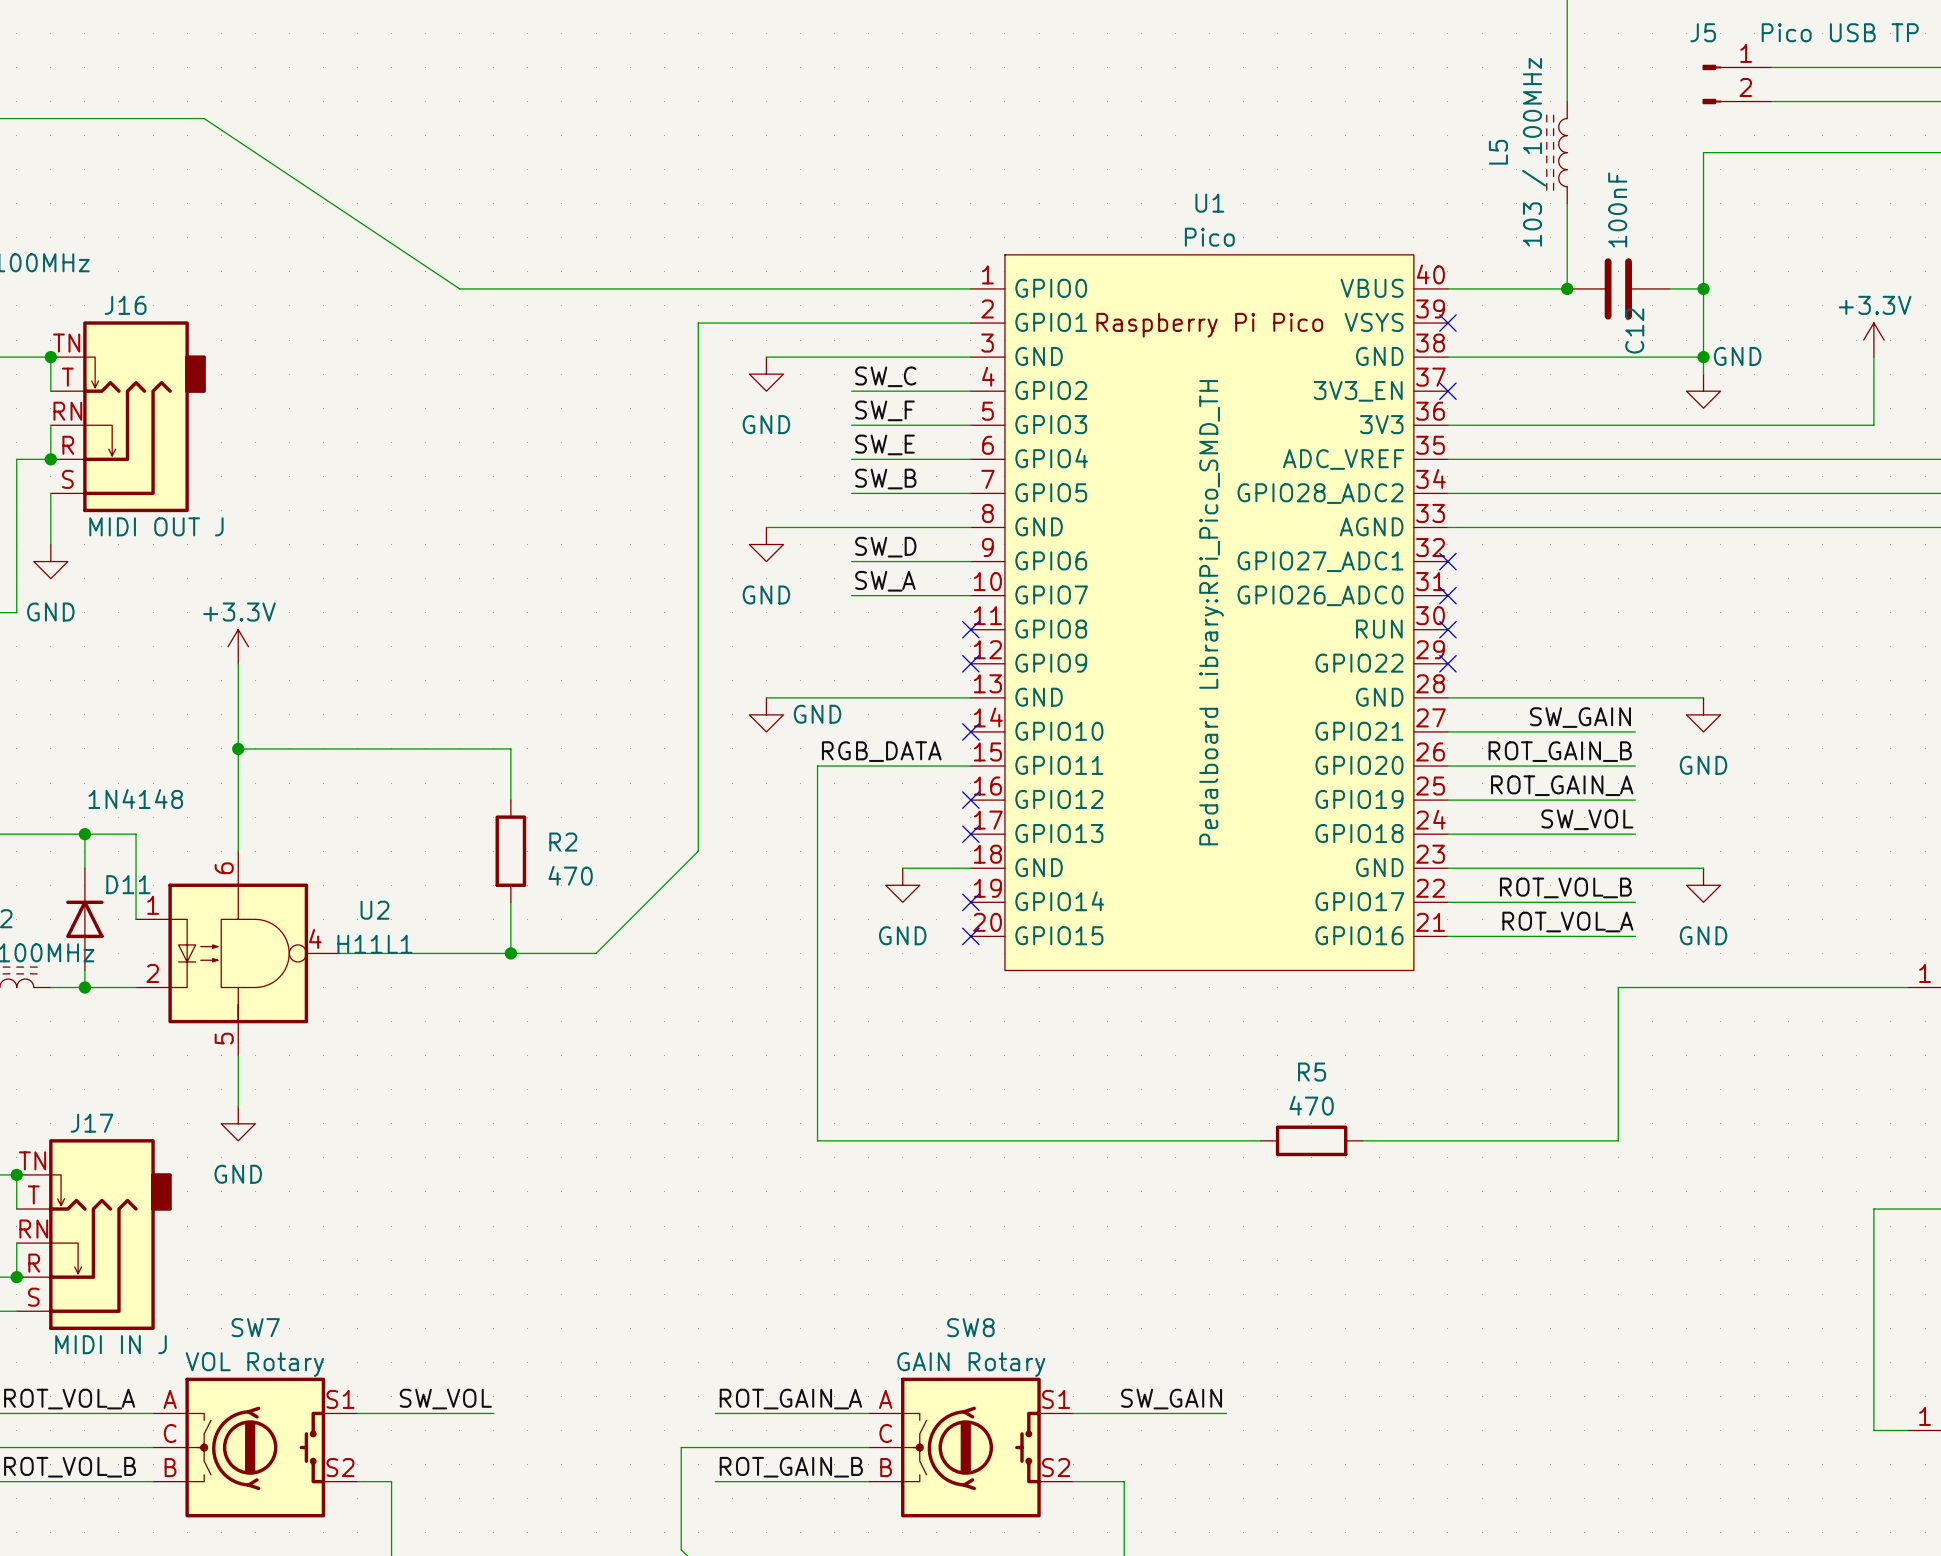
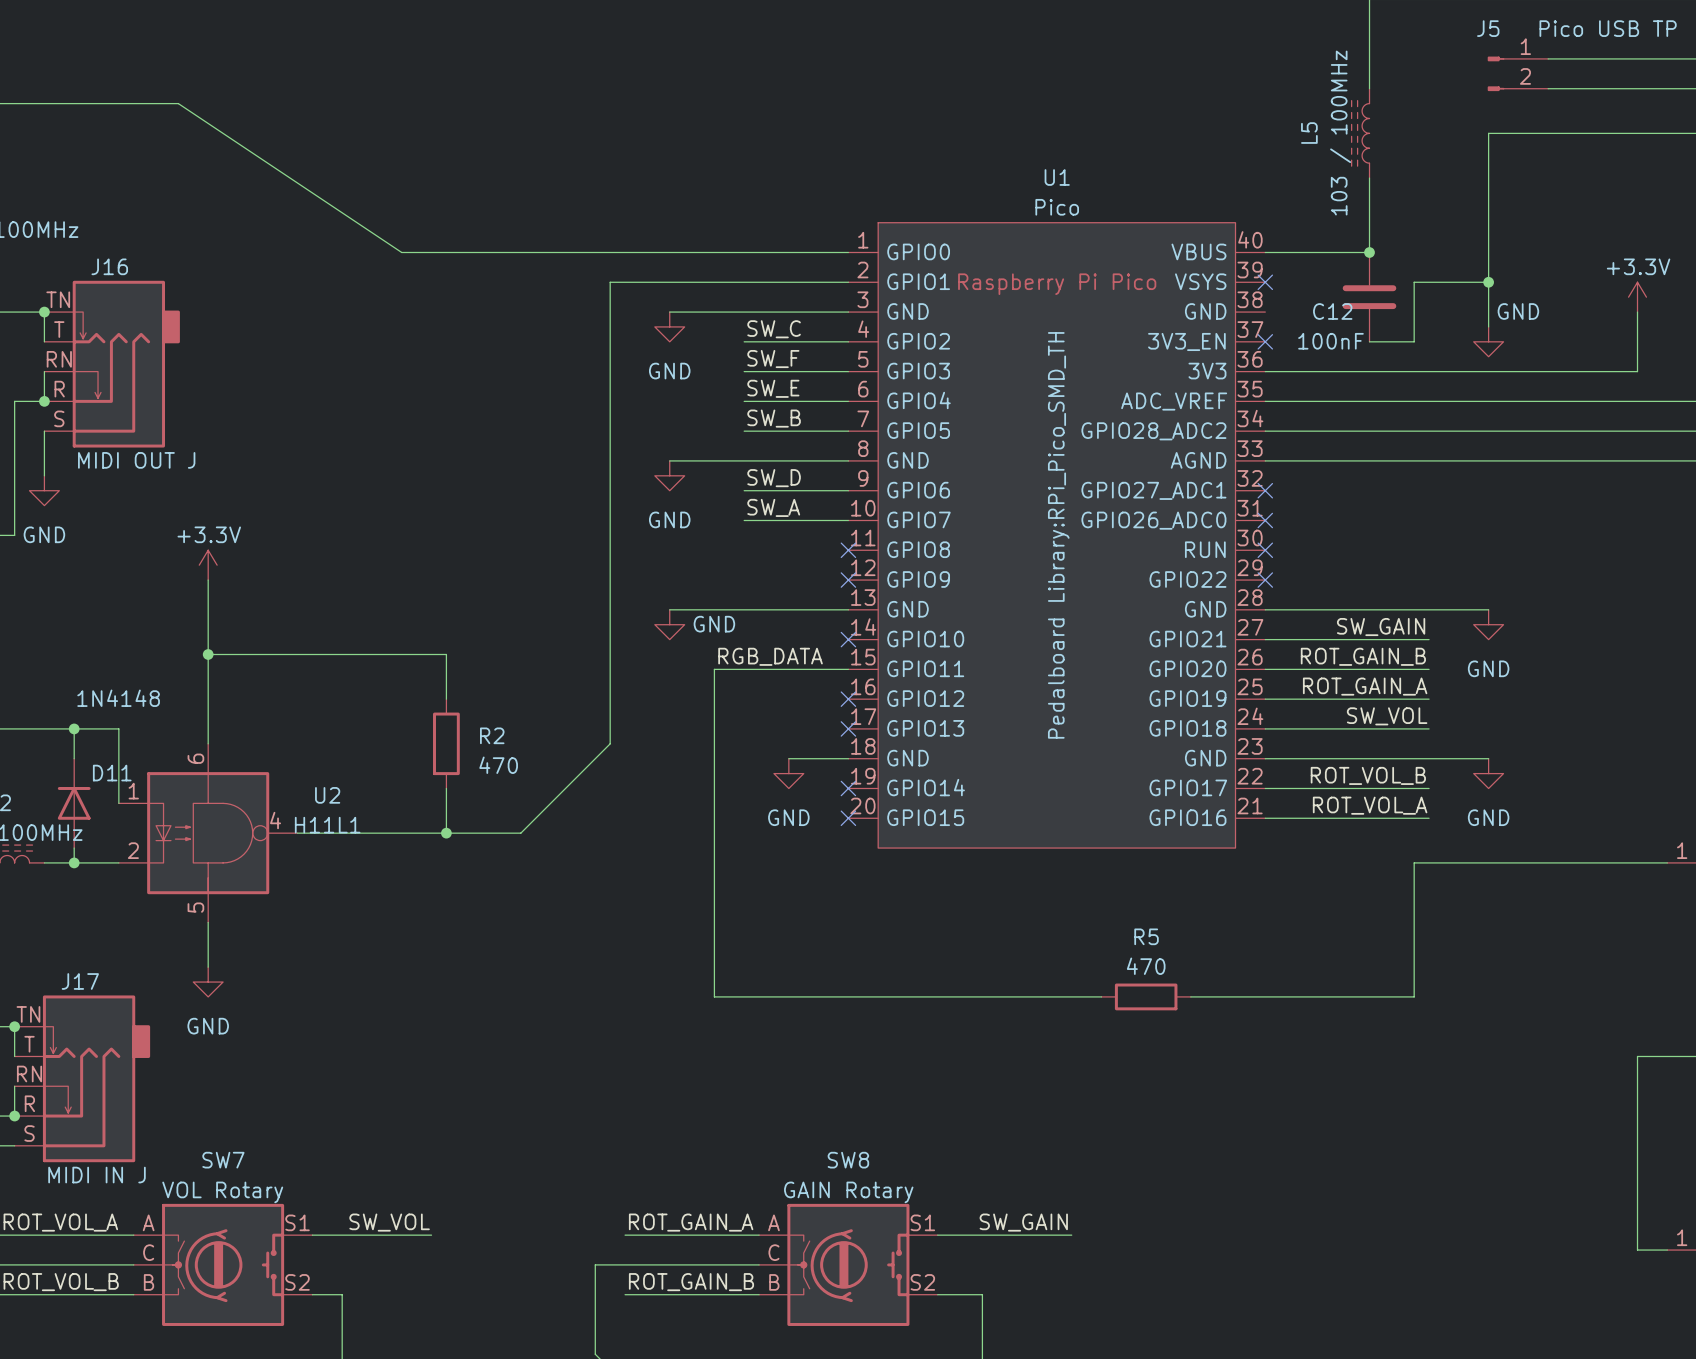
C12 value position: 100nF (1617, 209) -> 100nF (1330, 341)
C12 rotation: 0° (1618, 288) -> 90° clockwise (1369, 297)
C12 position: (1618, 288) -> (1369, 297)
wire: (1669, 288) (1703, 288) -> none
junction: (1703, 288) -> none
wire: none -> (1488, 282) (1414, 282) (1414, 341) (1369, 341)
junction: none -> (1488, 282)
wire: (1447, 357) (1703, 357) -> none
junction: (1703, 357) -> none

